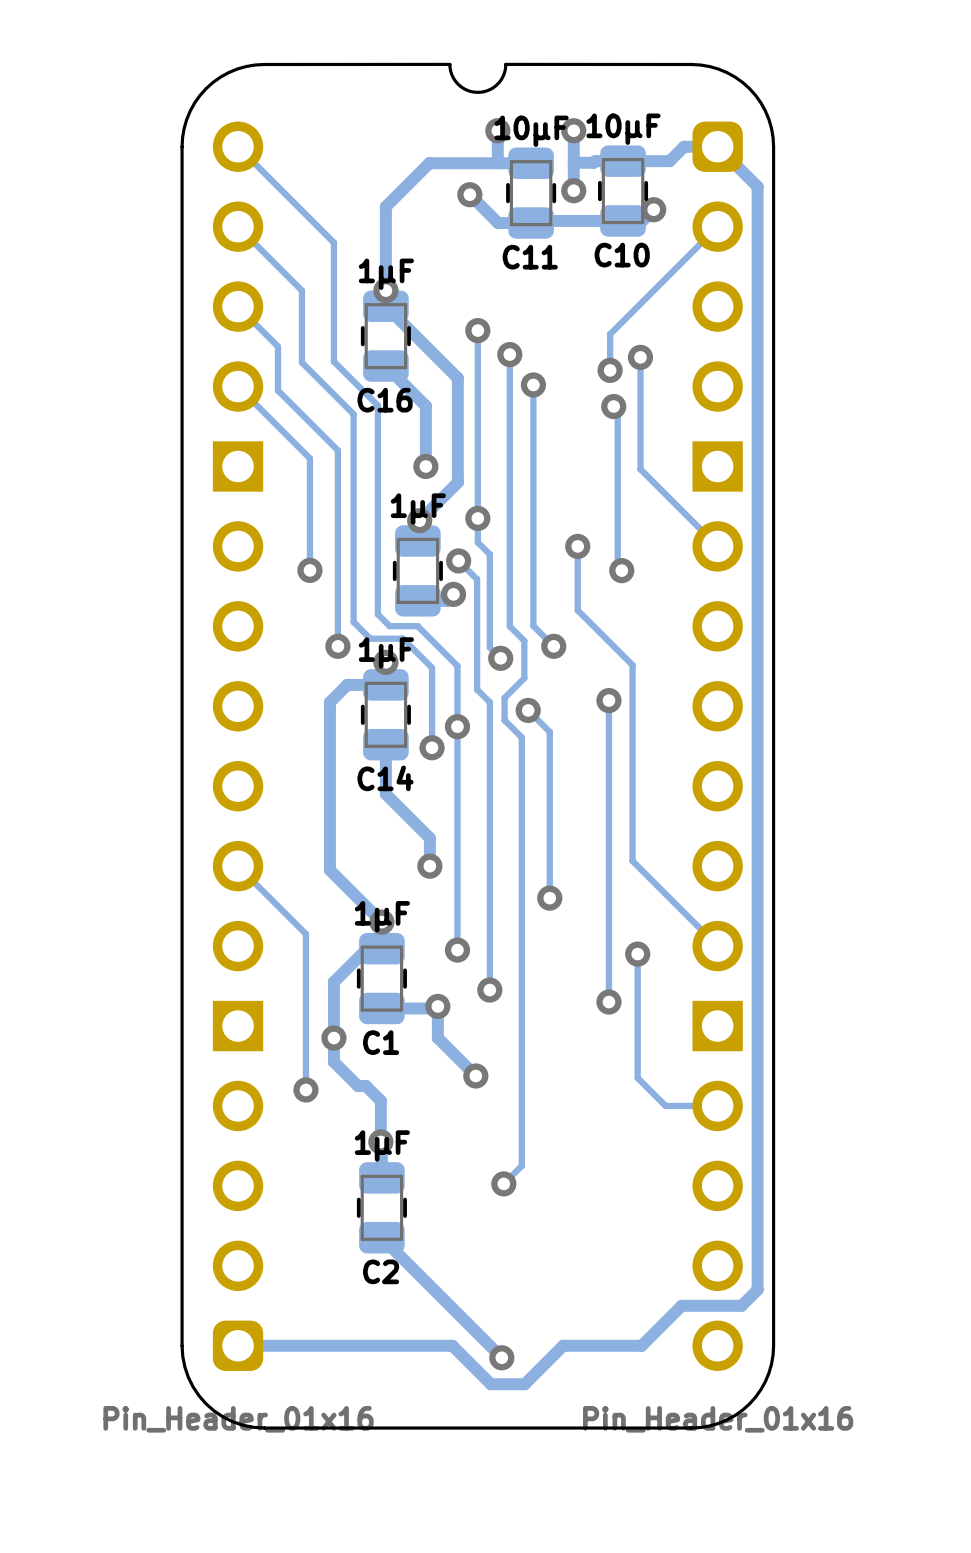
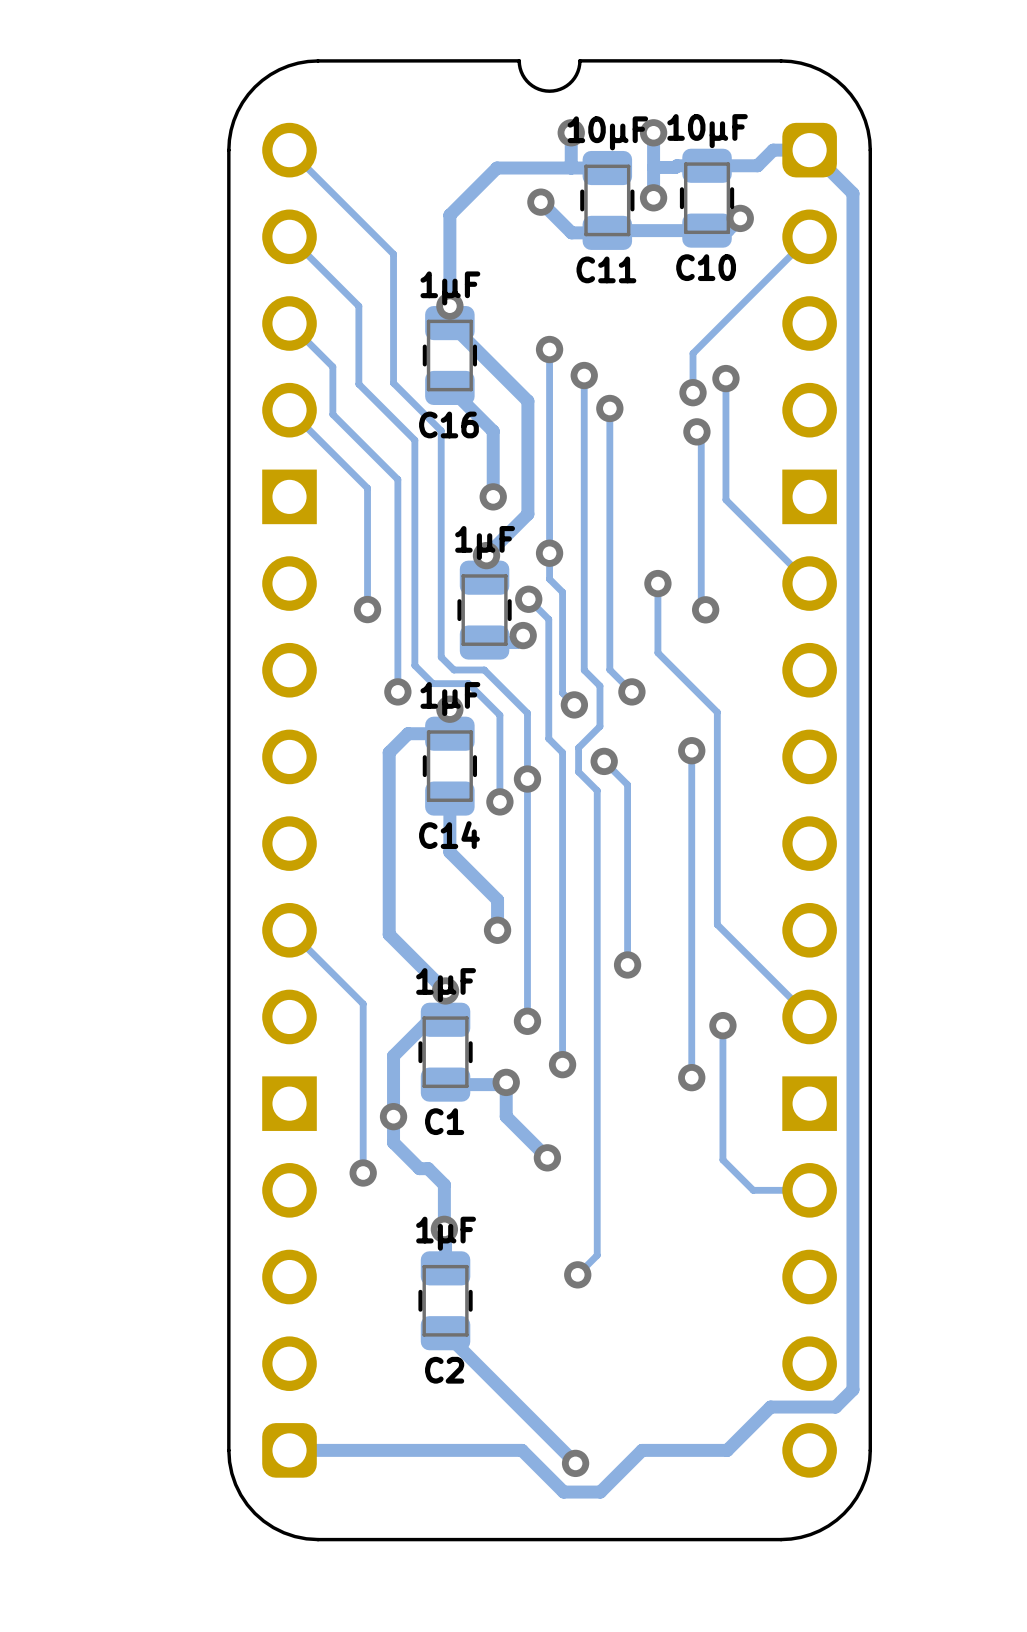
drawing: [103, 1406, 374, 1433] -> none
drawing: [583, 1406, 854, 1433] -> none

